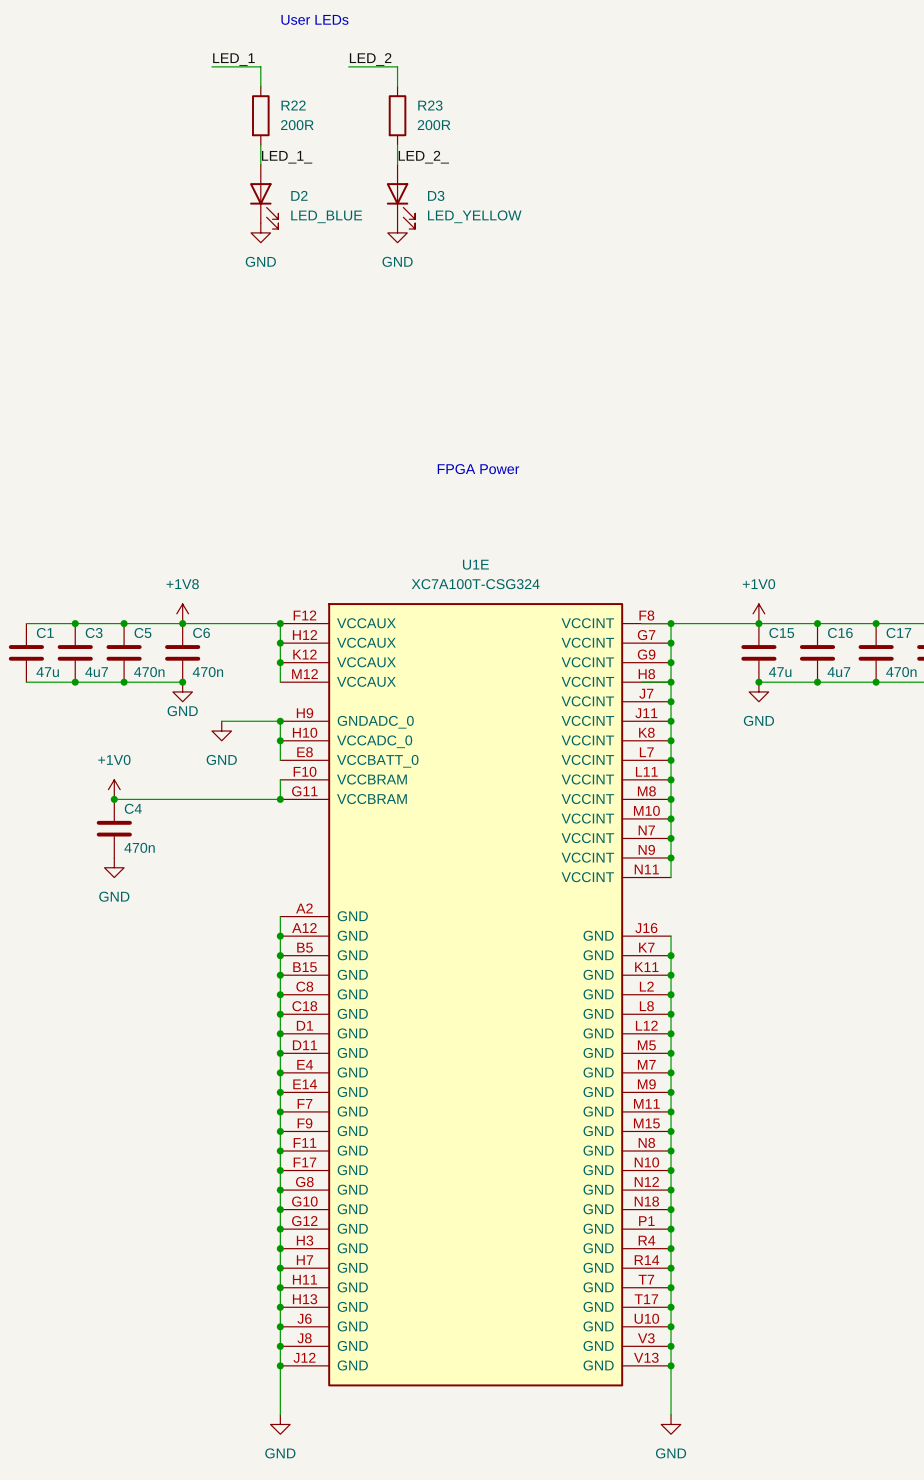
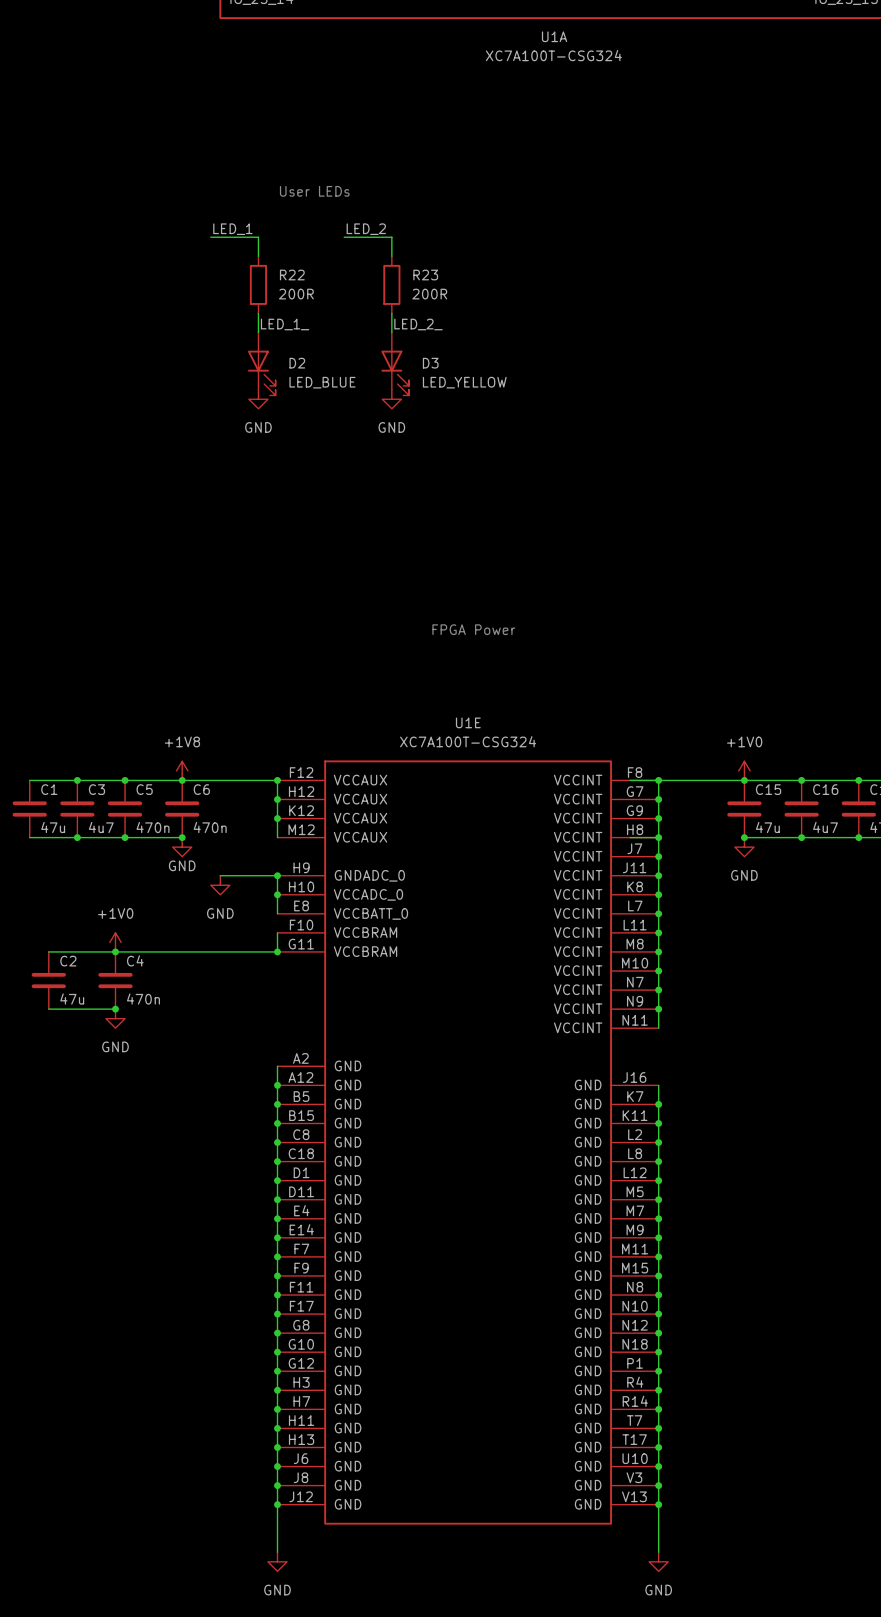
wire: none -> (48, 951) (115, 951)
C2: none -> 47u (48, 980)
wire: none -> (48, 1009) (115, 1009)
junction: none -> (115, 1009)

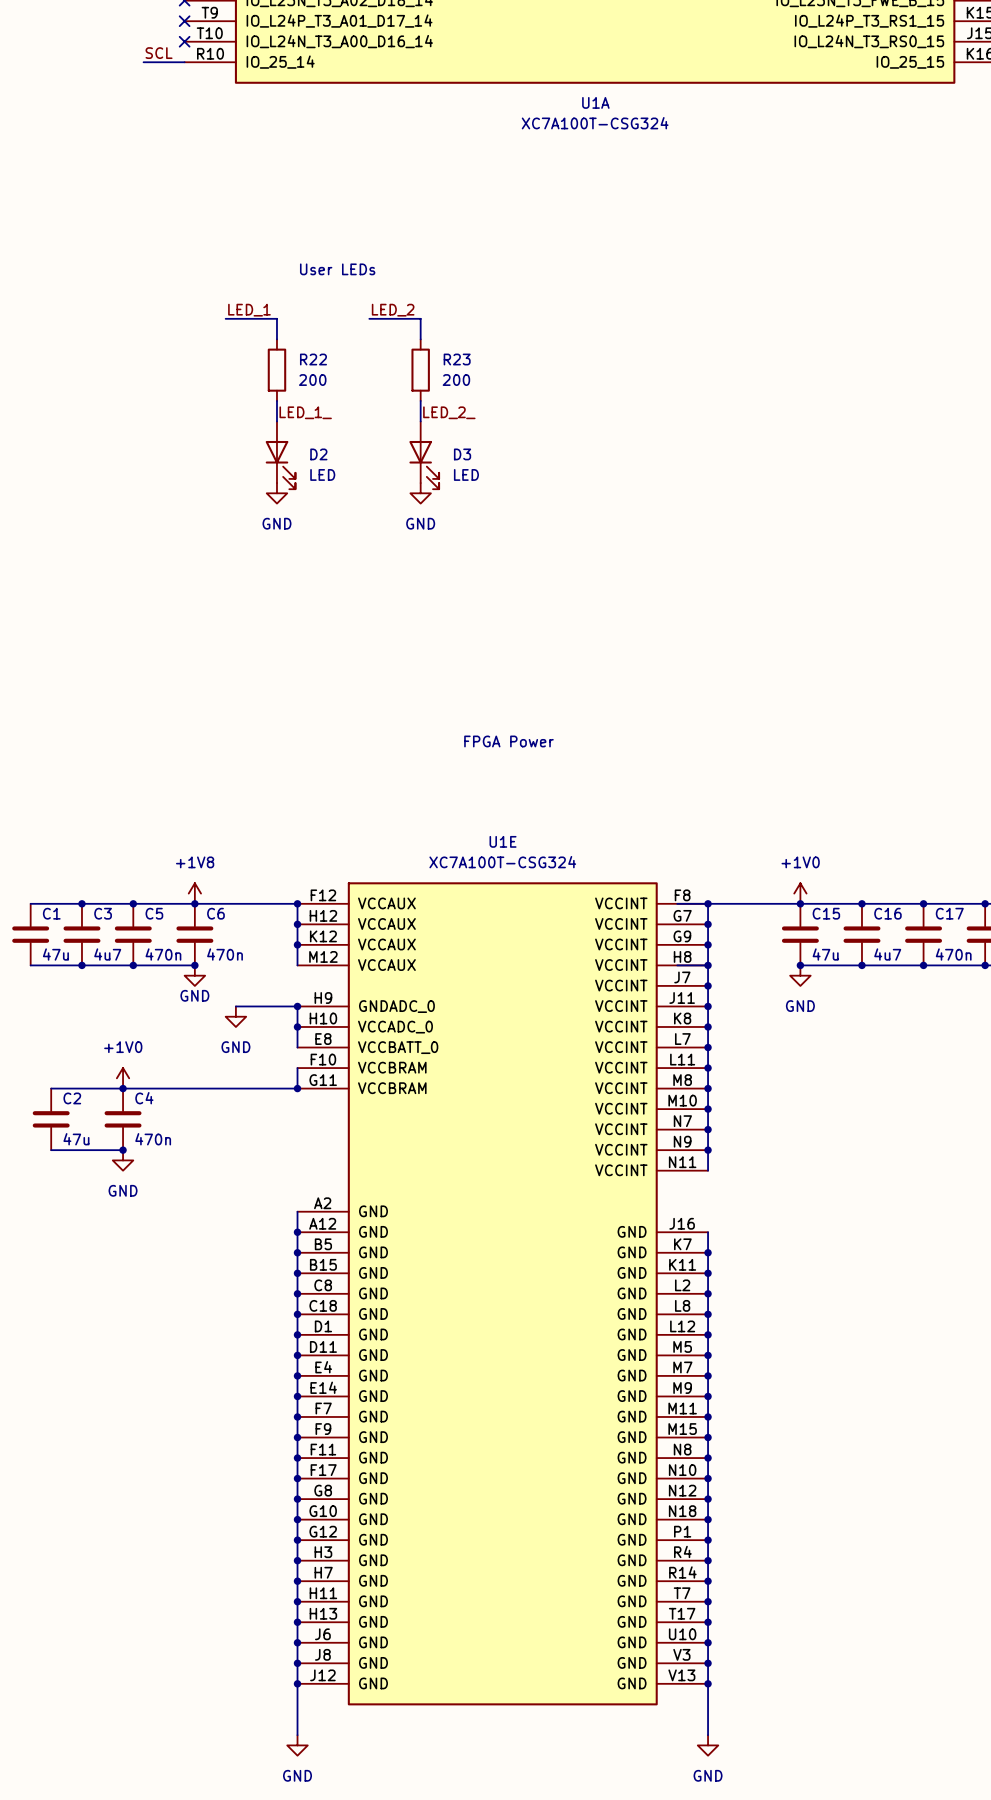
R22 value: 200R (296, 294) -> 200 (312, 380)
R23 value: 200R (429, 294) -> 200 (456, 380)
D2 value: LED_BLUE (322, 382) -> LED (322, 474)
D3 value: LED_YELLOW (464, 382) -> LED (466, 474)

